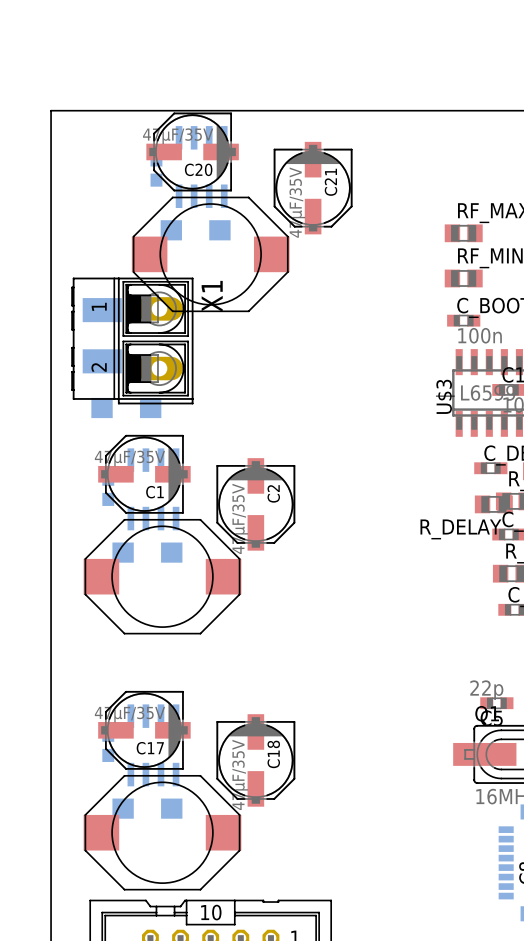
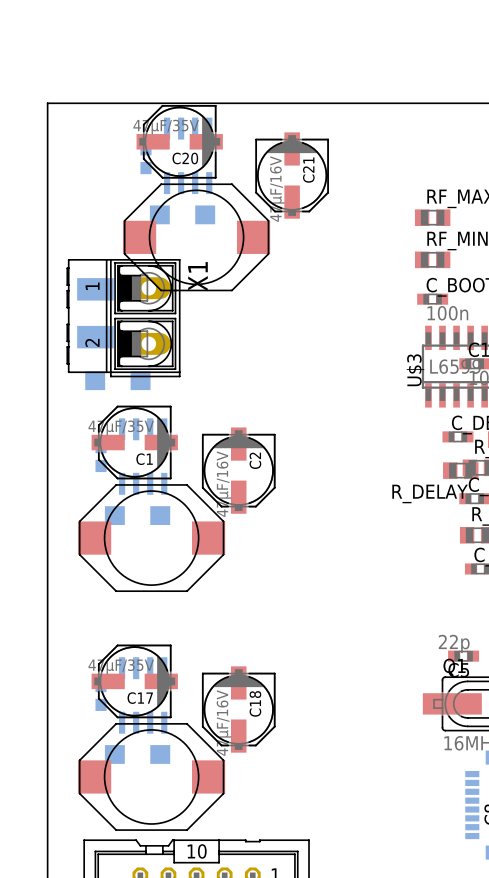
C21 value: 47µF/35V (297, 202) -> 47µF/16V (277, 189)
C2 value: 47µF/35V (240, 518) -> 47µF/16V (224, 484)
C18 value: 47µF/35V (240, 774) -> 47µF/16V (224, 723)

